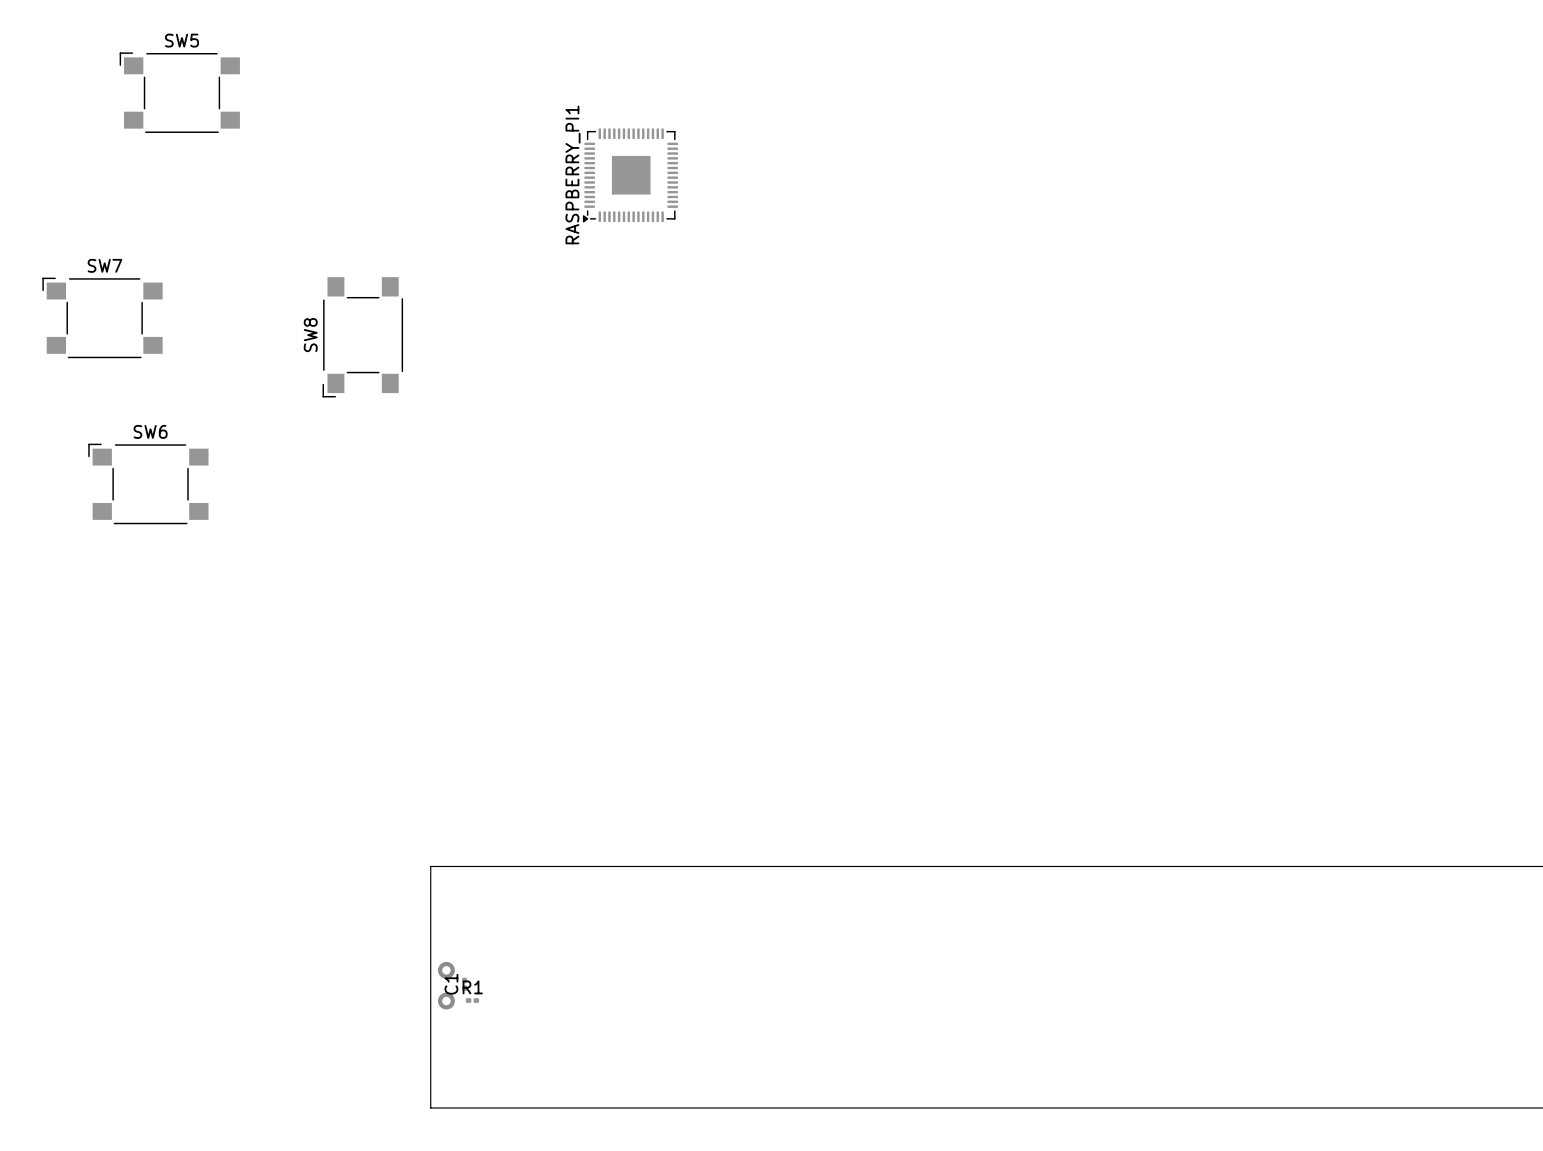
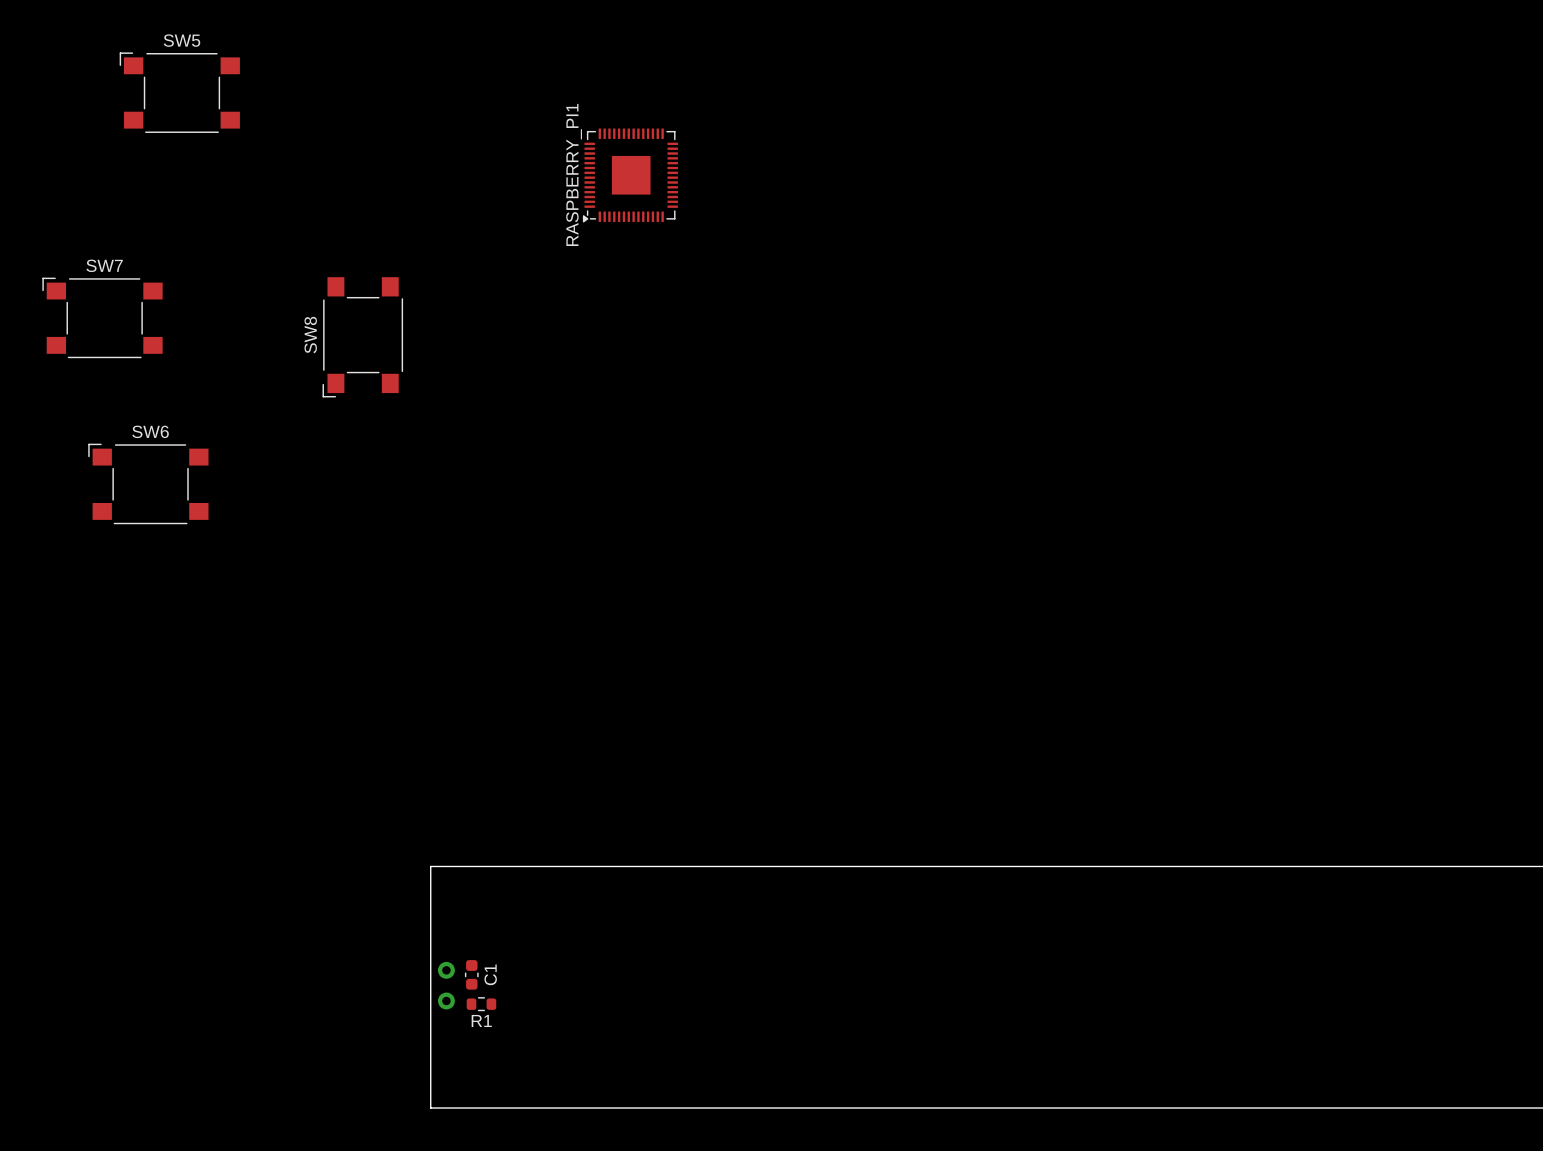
C1 footprint: [462, 977, 467, 991] -> [464, 960, 479, 990]
C1 name position: C1 (451, 984) -> C1 (490, 974)
R1 name position: R1 (472, 987) -> R1 (481, 1020)
R1 footprint: [465, 998, 480, 1003] -> [466, 997, 497, 1012]

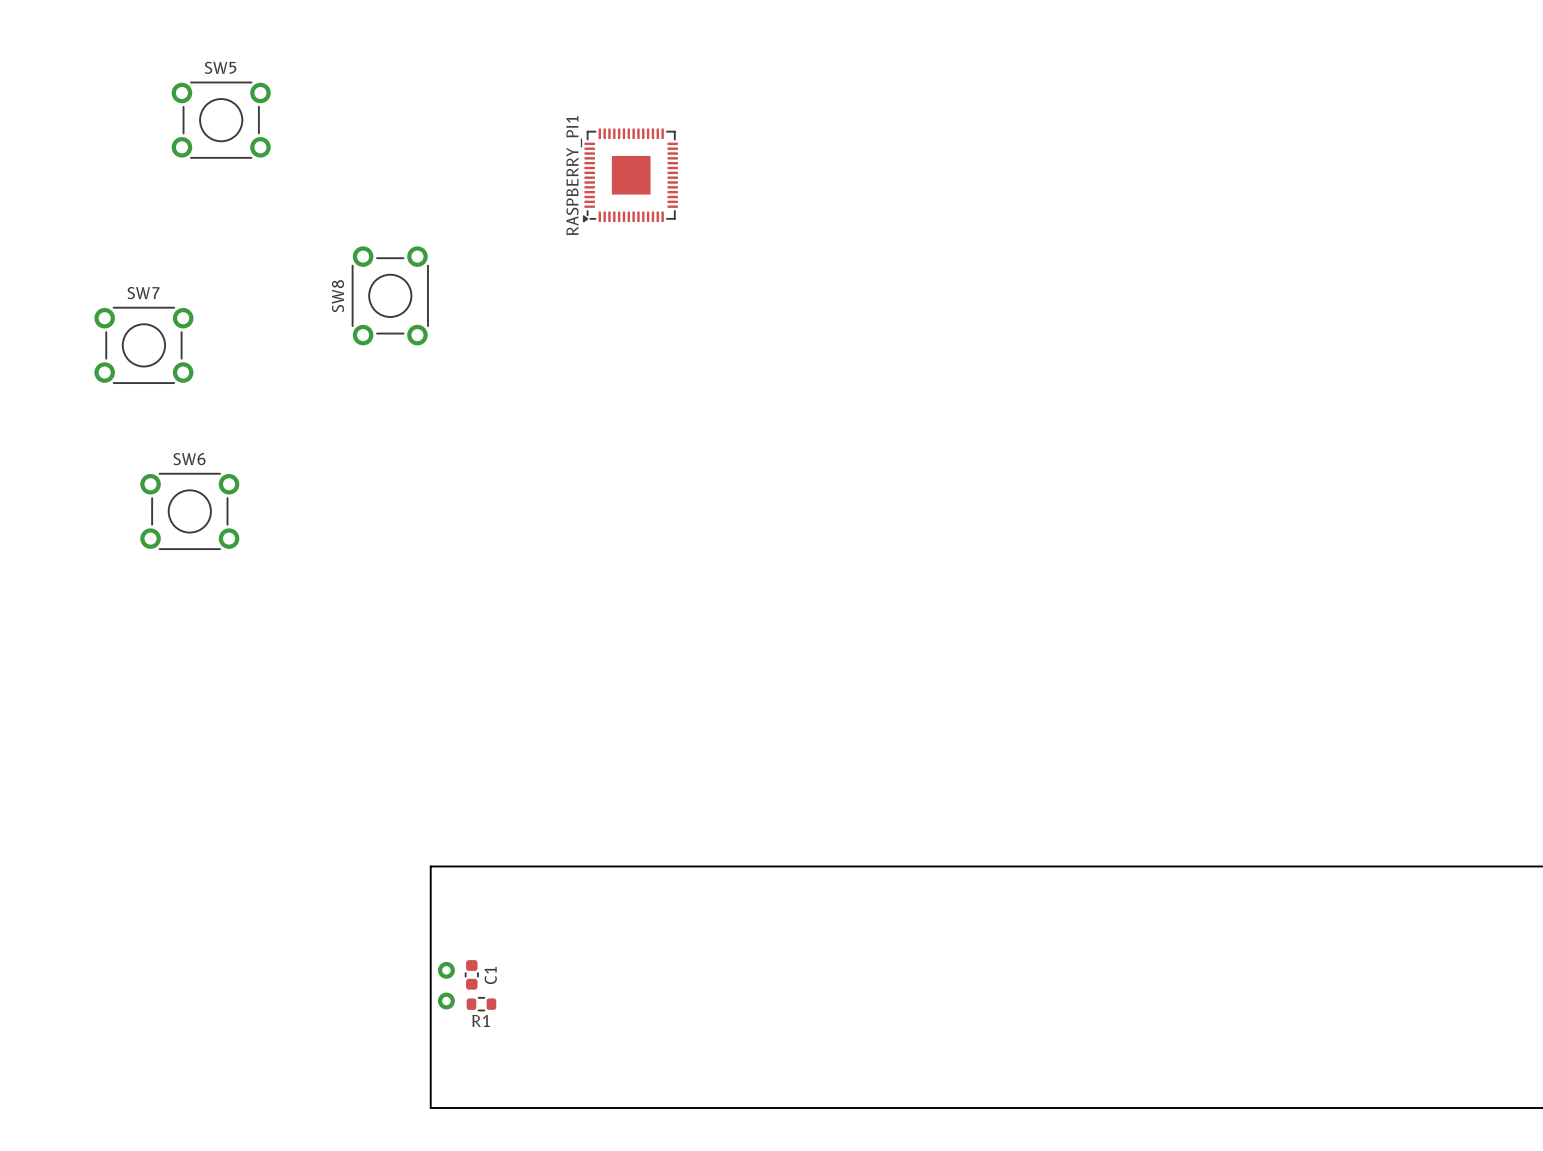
SW5 footprint: [119, 52, 240, 133] -> [171, 81, 271, 159]
SW7 footprint: [42, 277, 163, 359] -> [94, 306, 194, 384]
SW8 footprint: [322, 277, 404, 398] -> [351, 246, 429, 346]
SW6 footprint: [88, 443, 209, 525] -> [140, 473, 240, 550]

